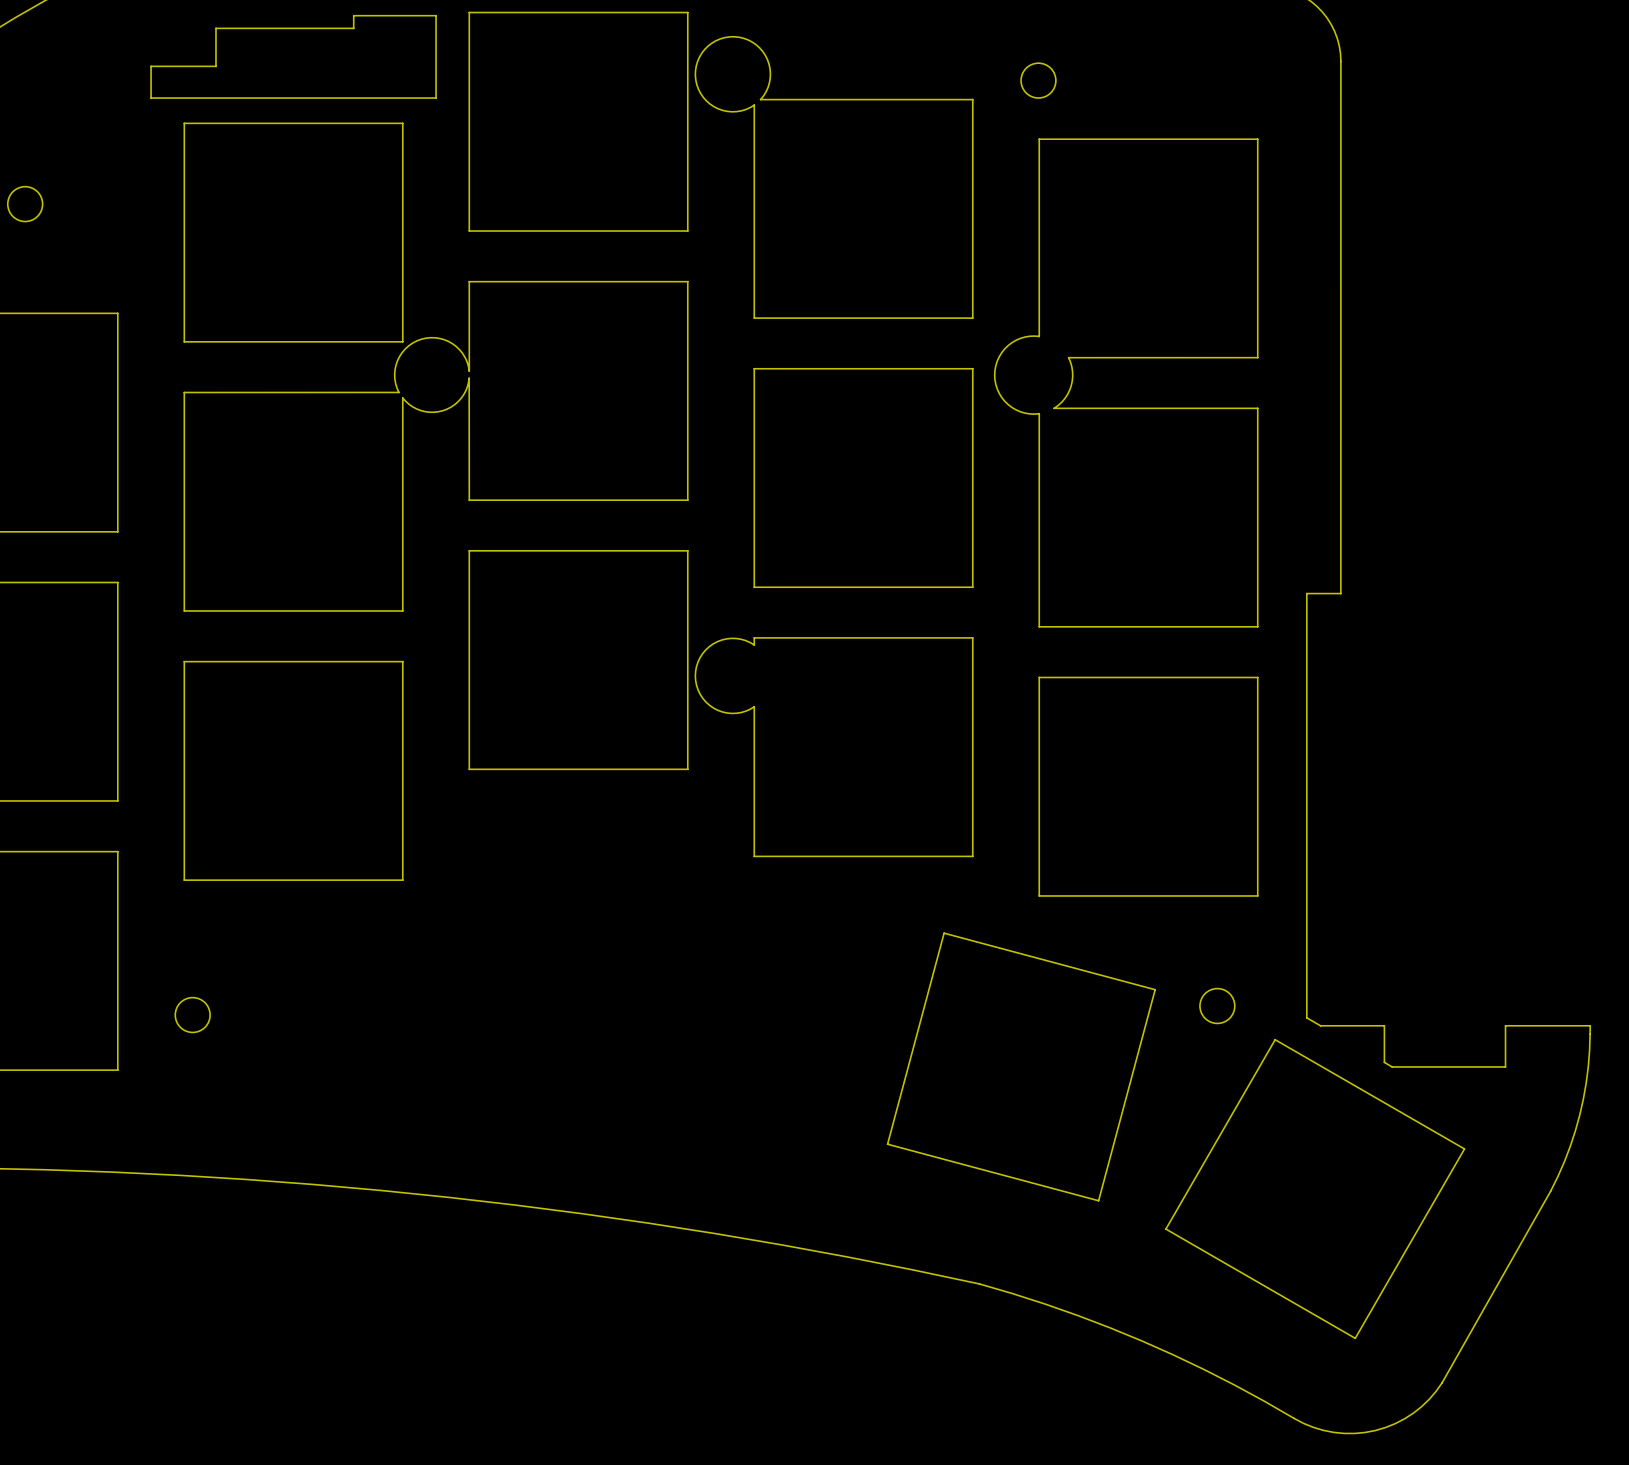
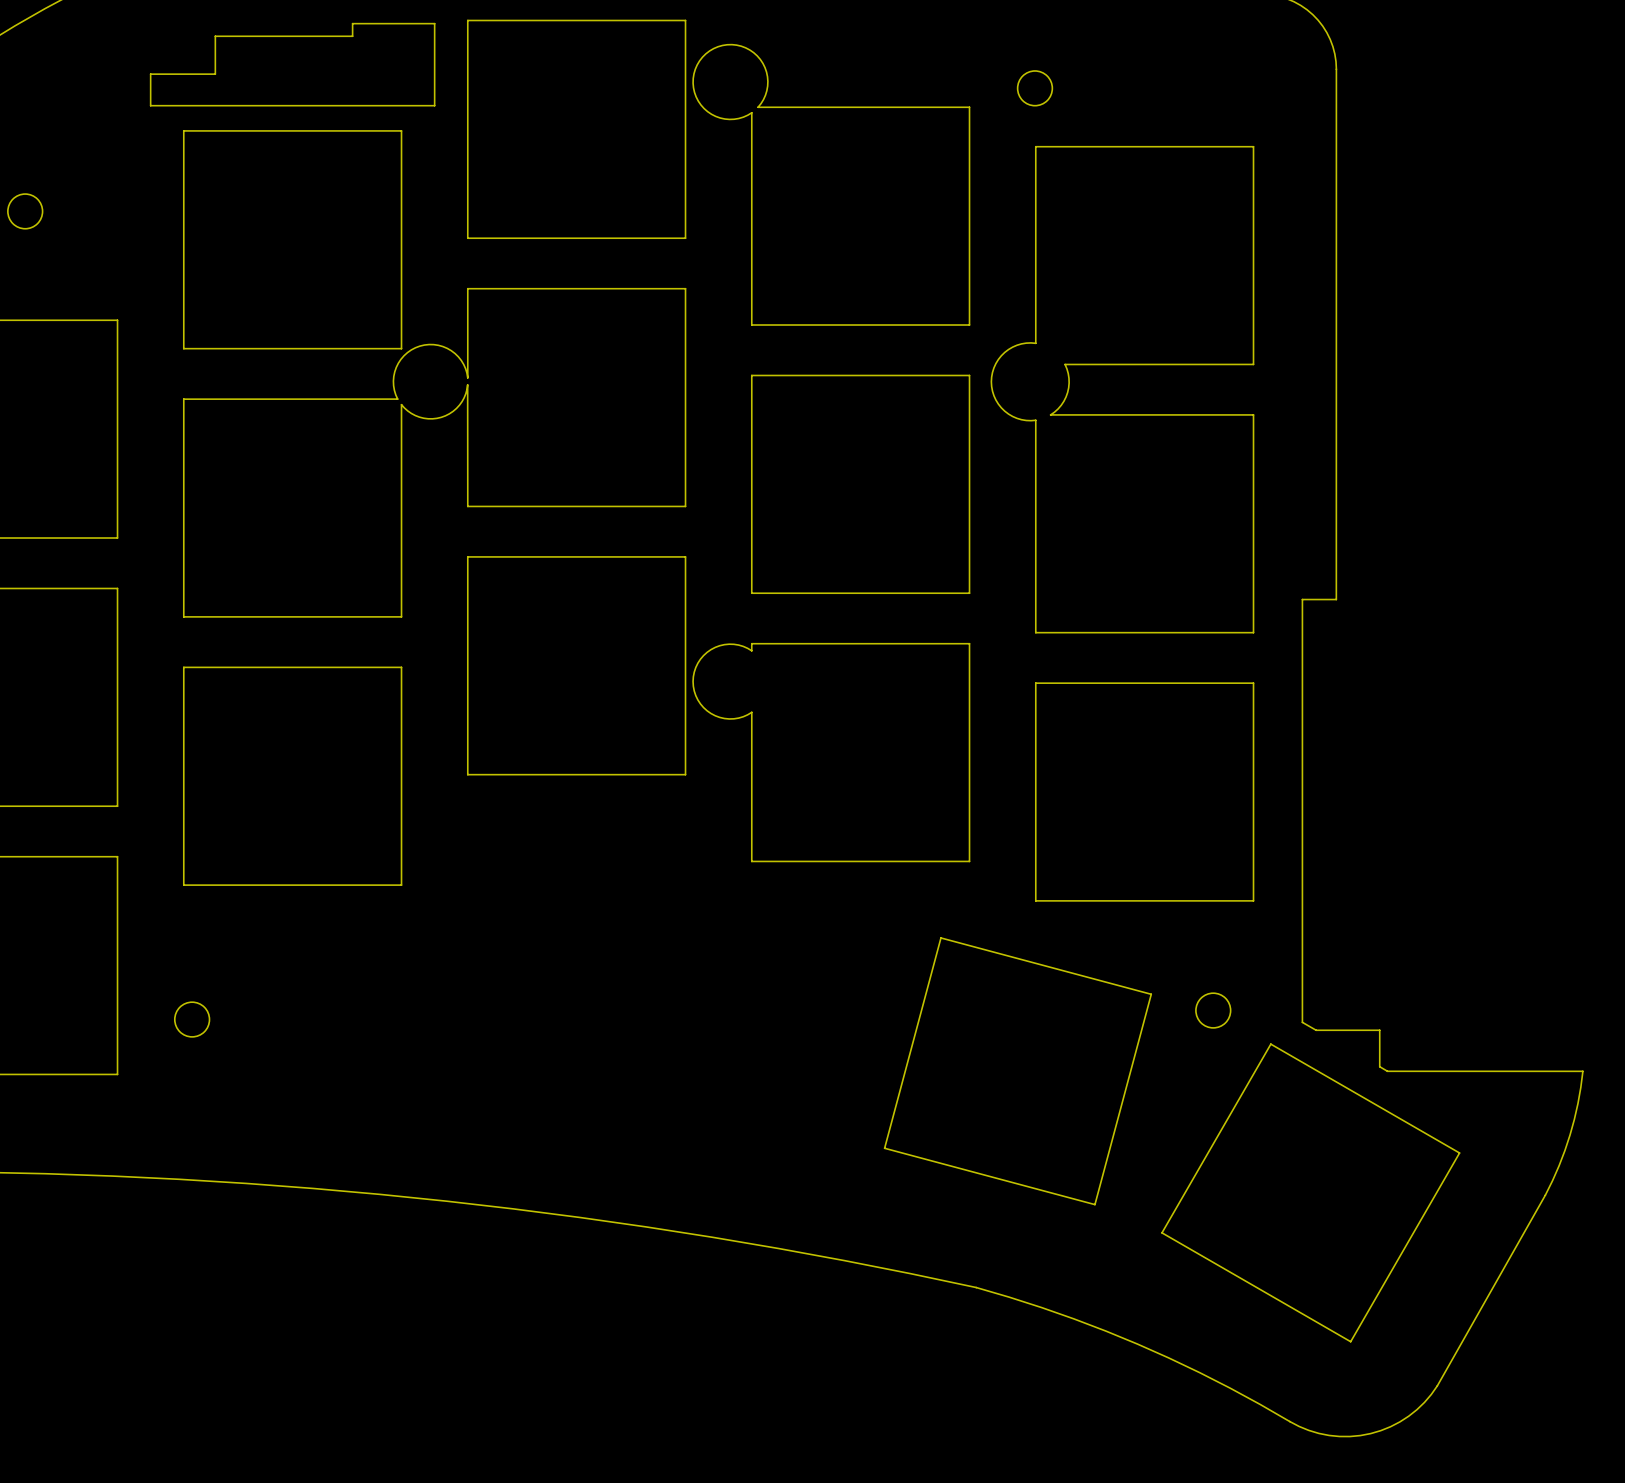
board edge: (1392, 1066) (1505, 1066) (1505, 1025) (1590, 1025) (1588, 1066) (1579, 1115) (1570, 1146) (1550, 1191) -> (1387, 1071) (1582, 1071) (1577, 1103) (1570, 1135) (1559, 1165) (1545, 1195)

